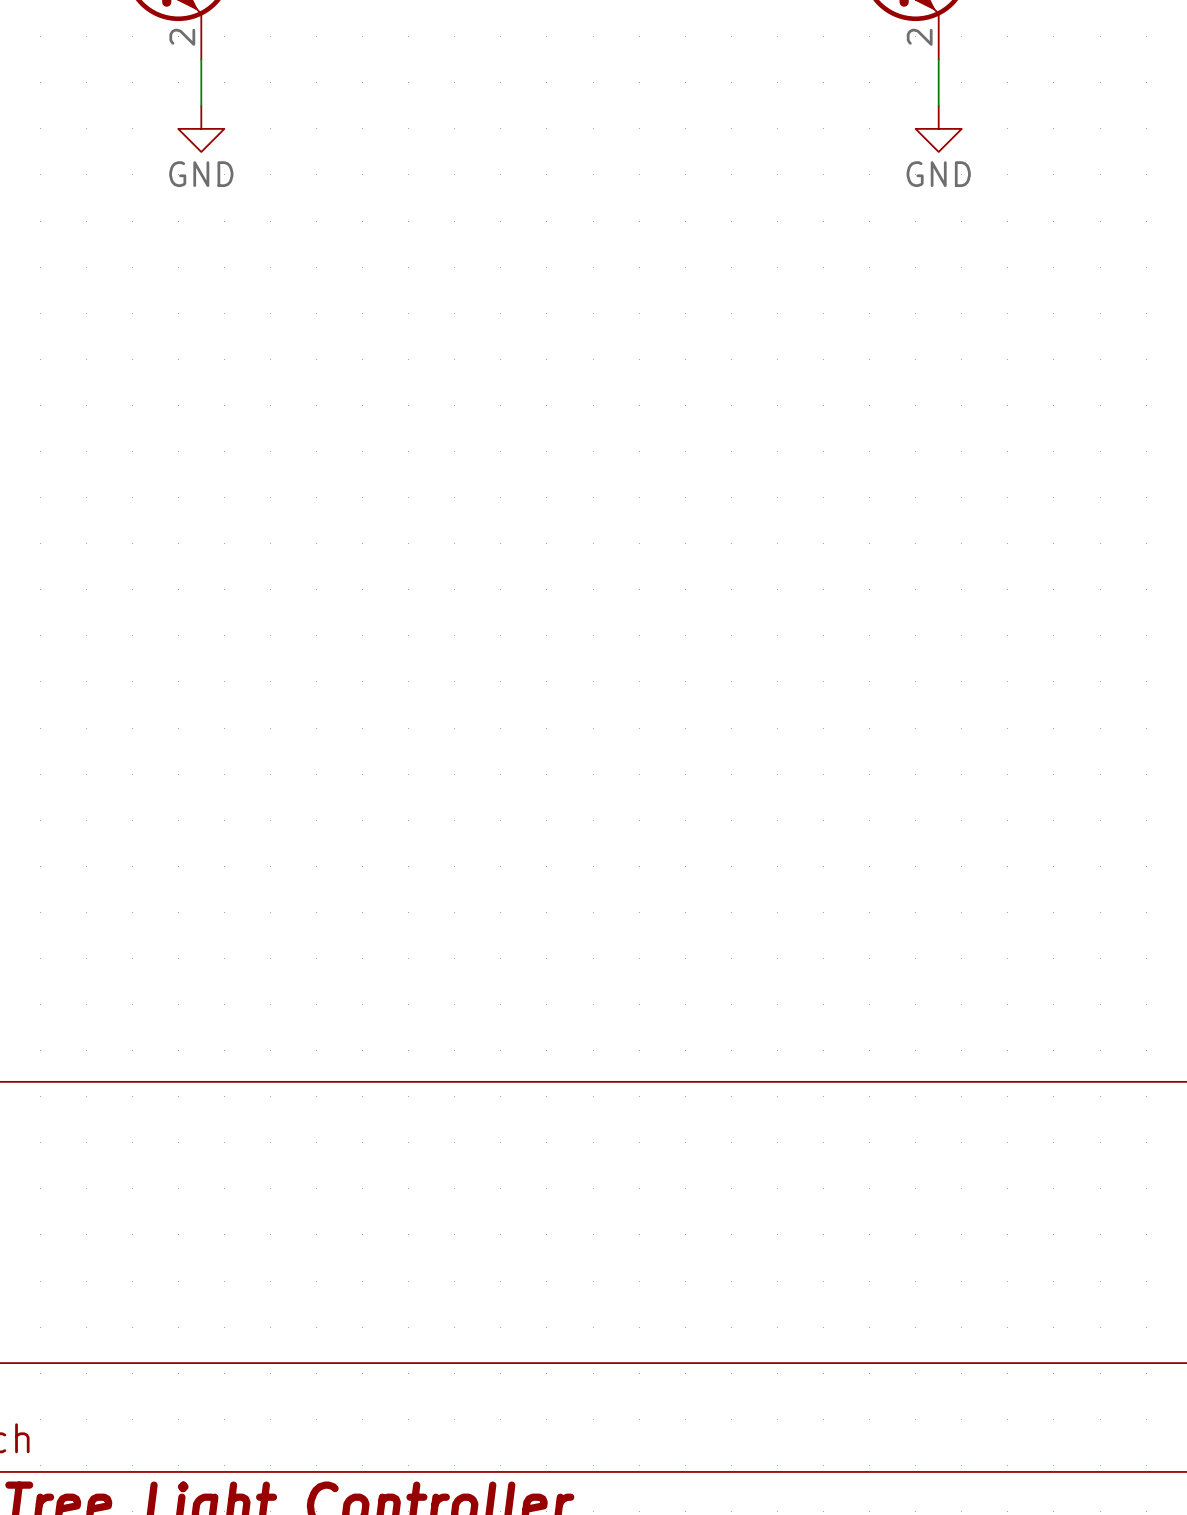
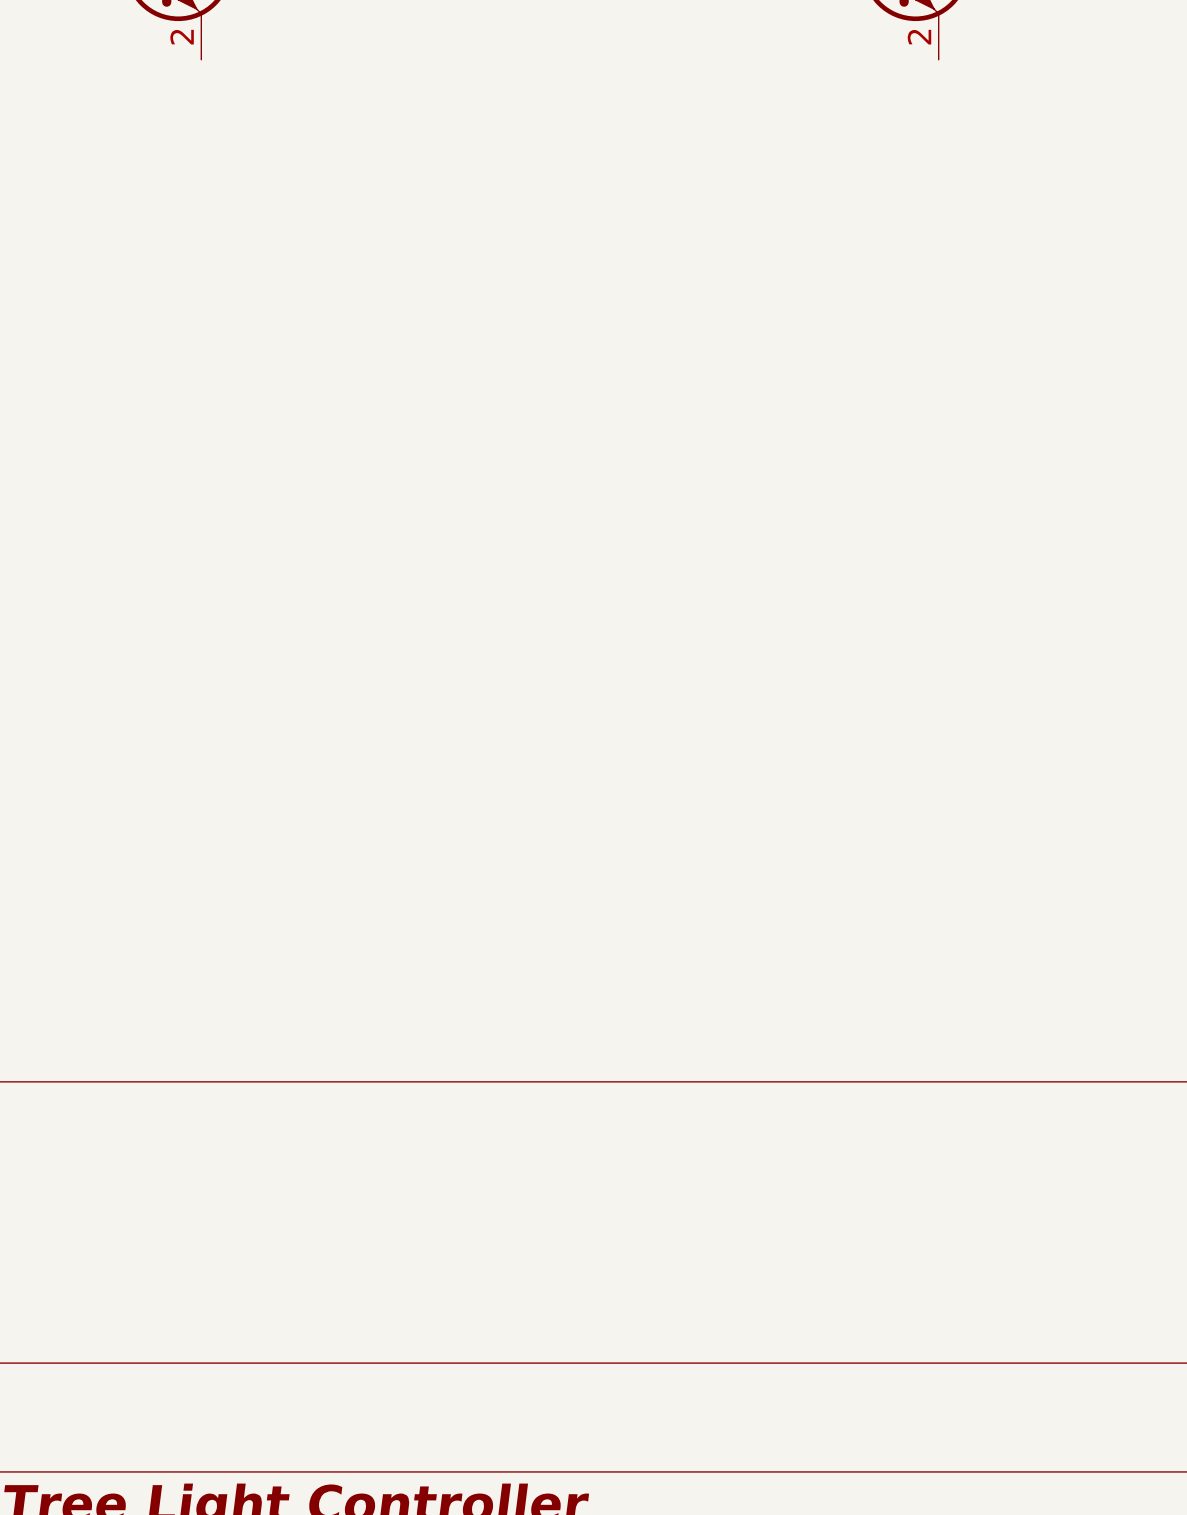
wire: (201, 59) (201, 105) -> none
wire: (938, 59) (938, 105) -> none
power symbol: GND (201, 128) -> none
power symbol: GND (938, 128) -> none

